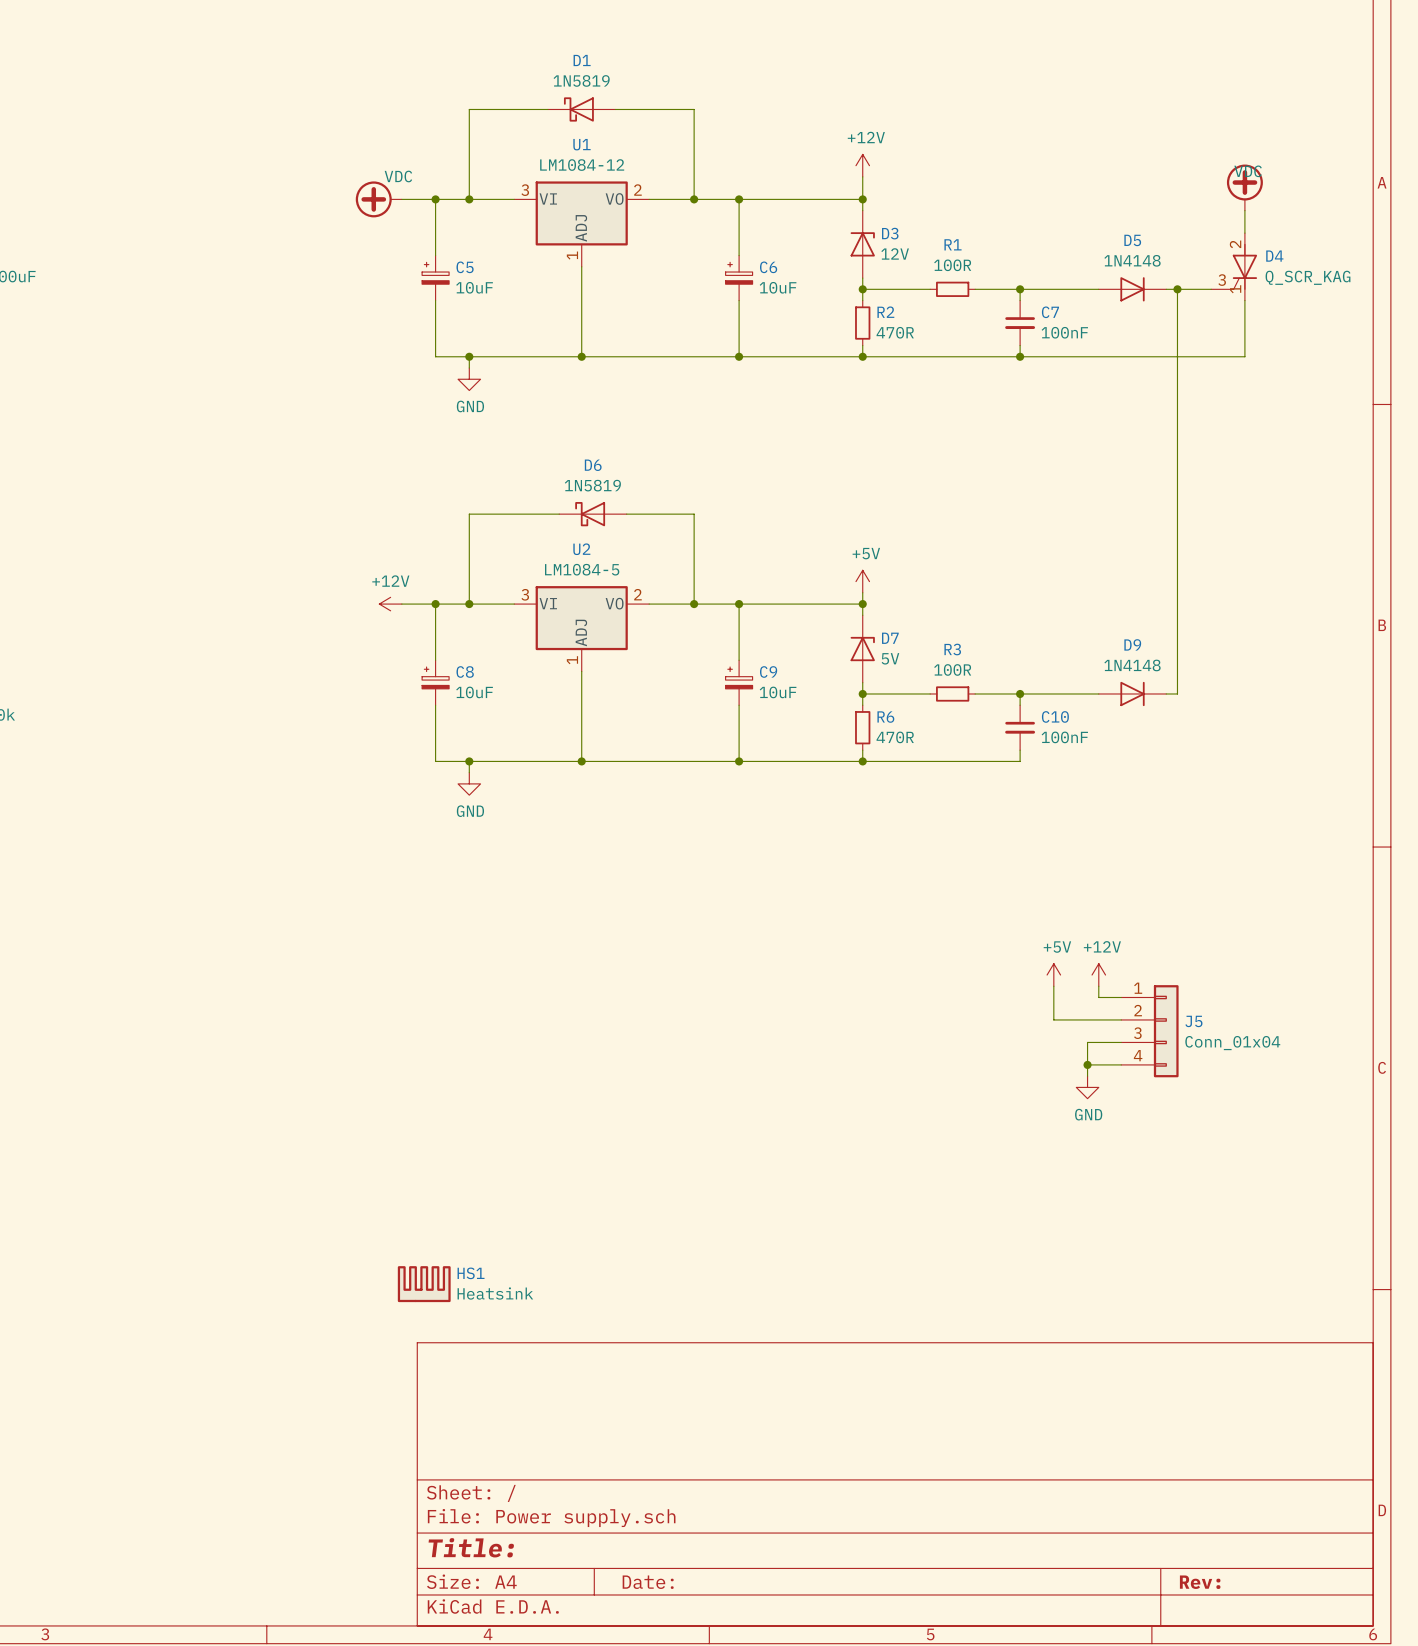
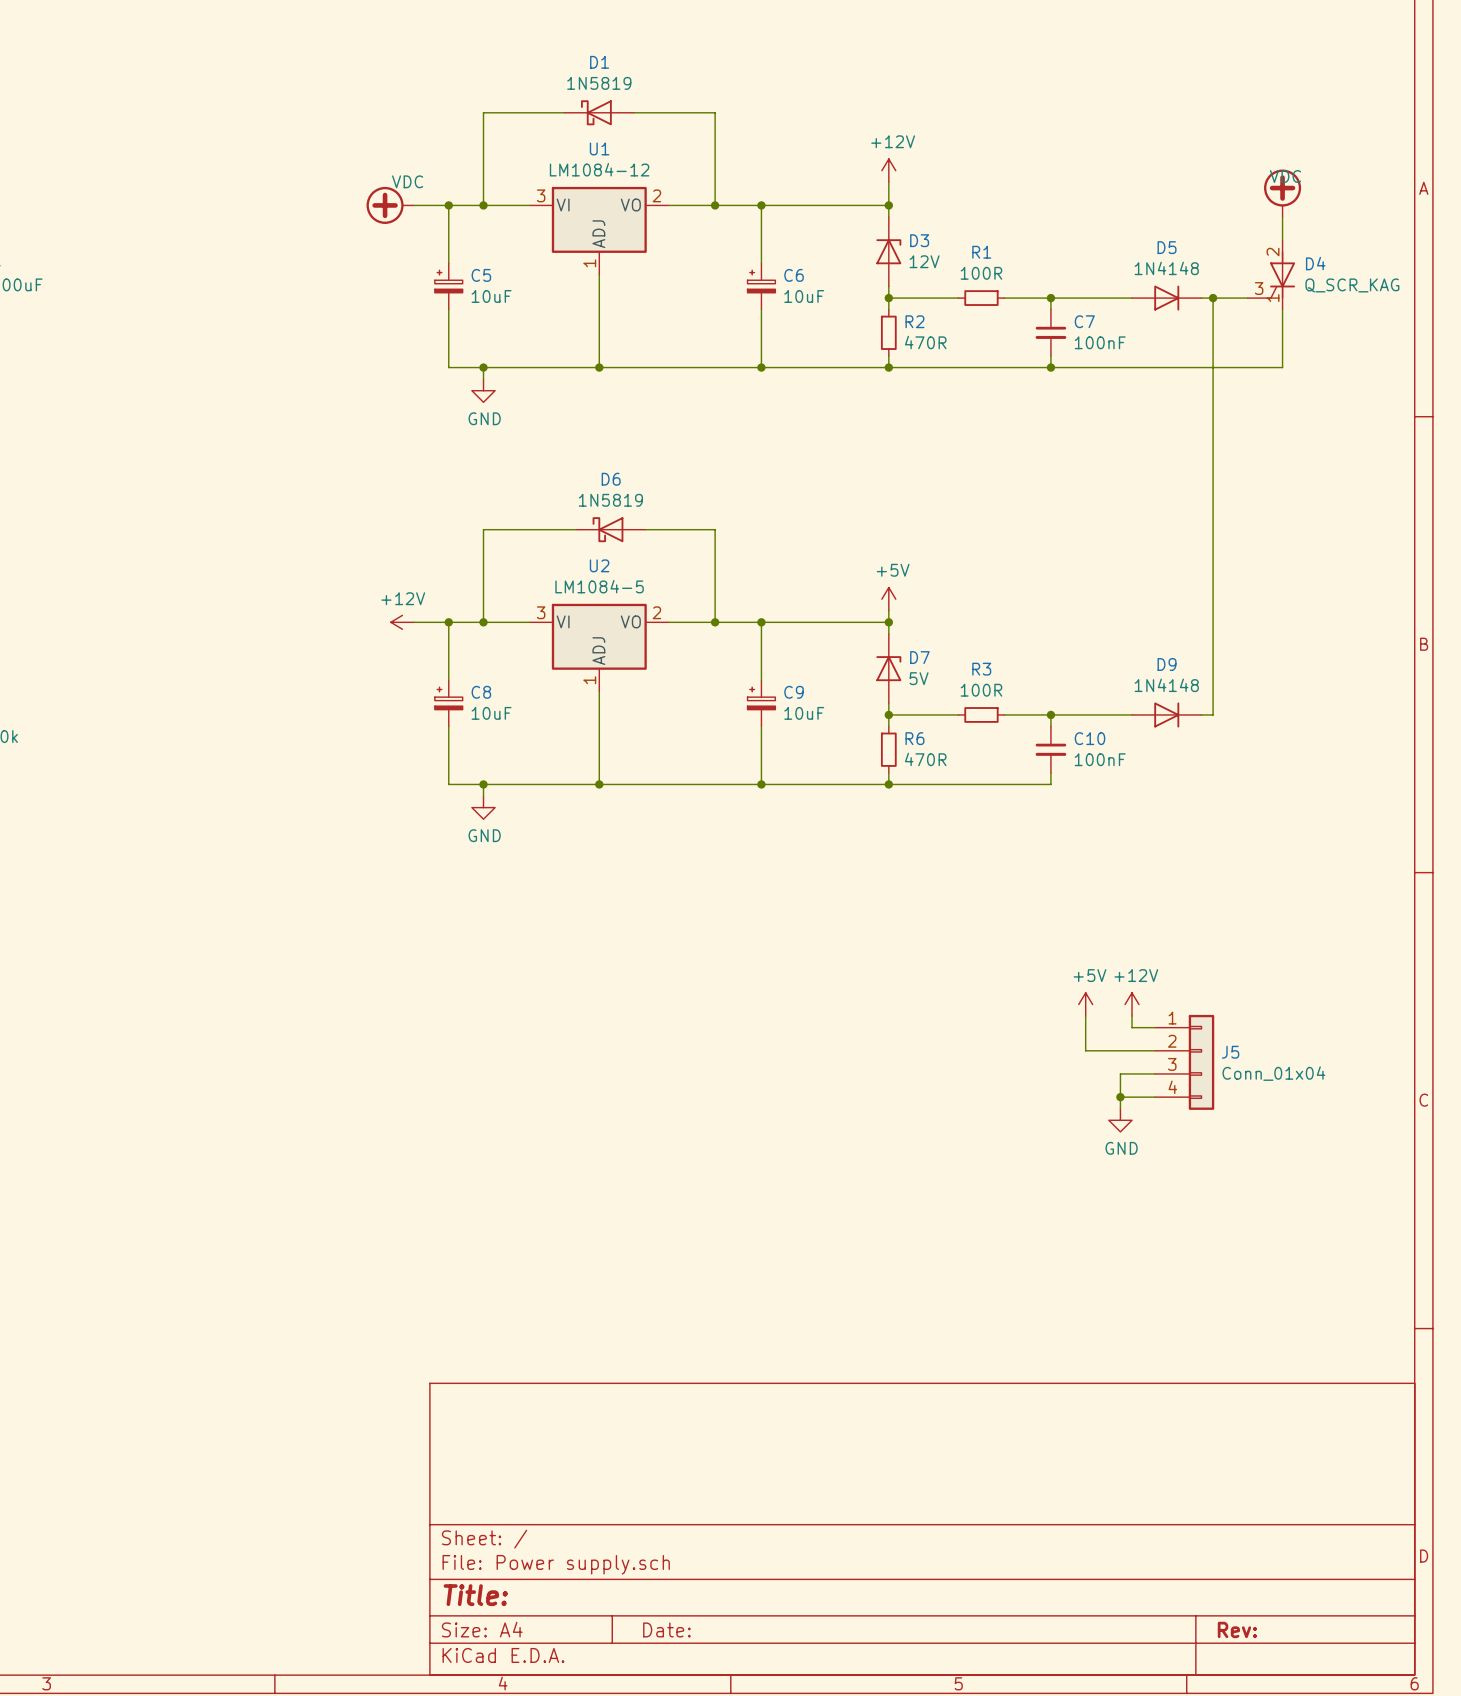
HS1: Heatsink (424, 1284) -> none

